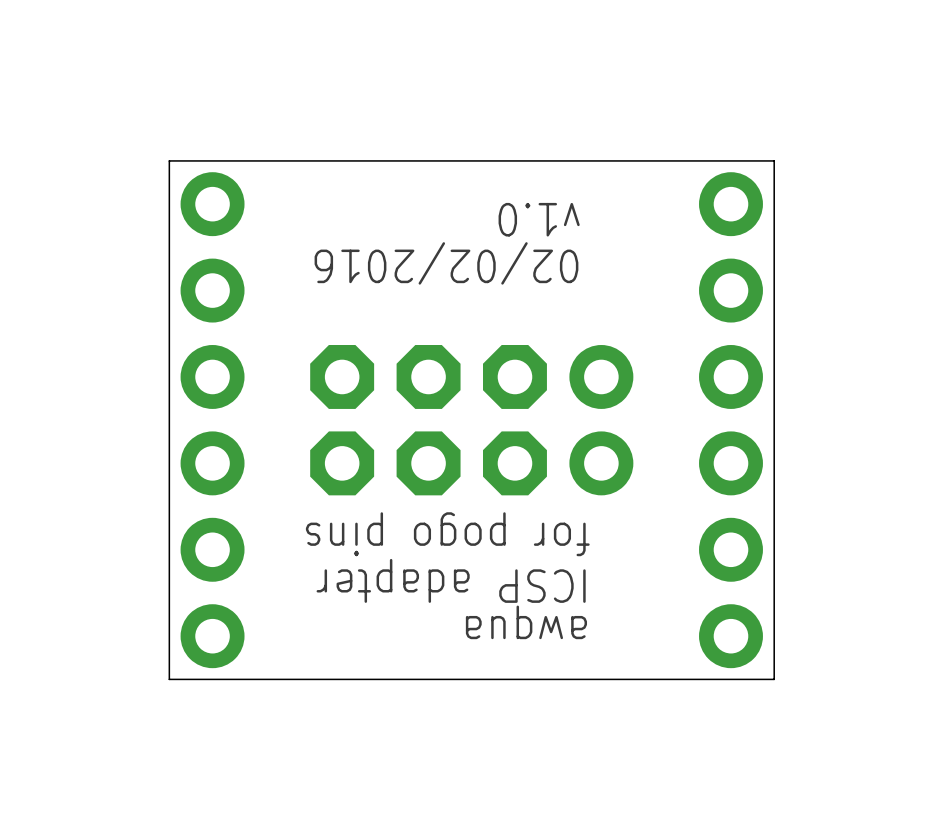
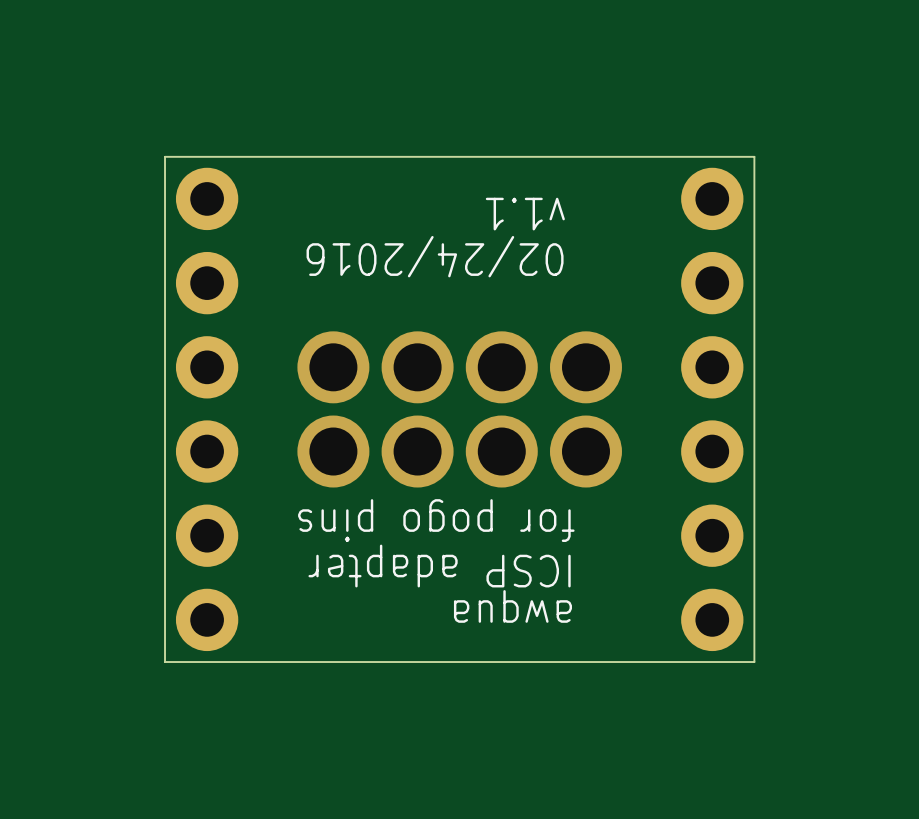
text: v1.0 (539, 219) -> v1.1 (525, 214)
text: 02/02/2016 (446, 263) -> 02/24/2016 (435, 256)
via: none -> (333, 367)
via: none -> (417, 367)
via: none -> (501, 367)
via: none -> (585, 367)
part: (428, 420) -> none
part: (601, 420) -> none
via: none -> (333, 451)
via: none -> (417, 451)
via: none -> (501, 451)
via: none -> (585, 451)

